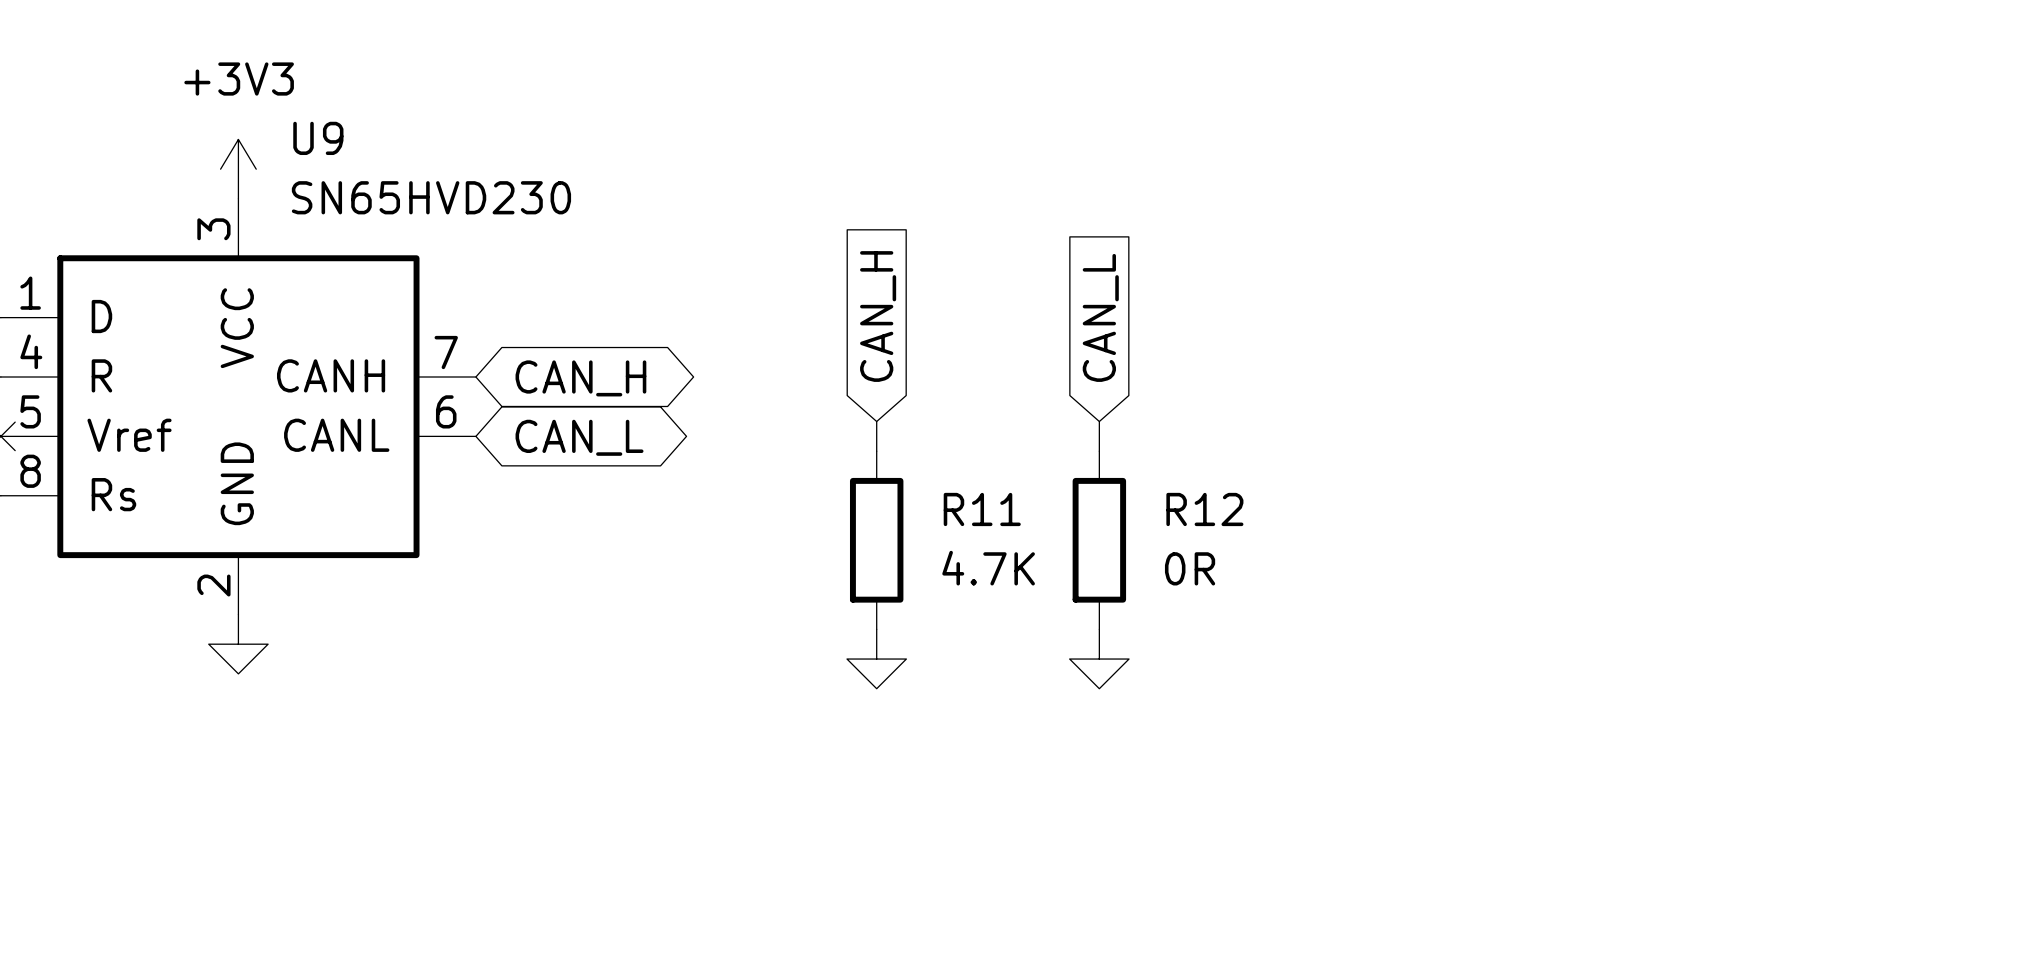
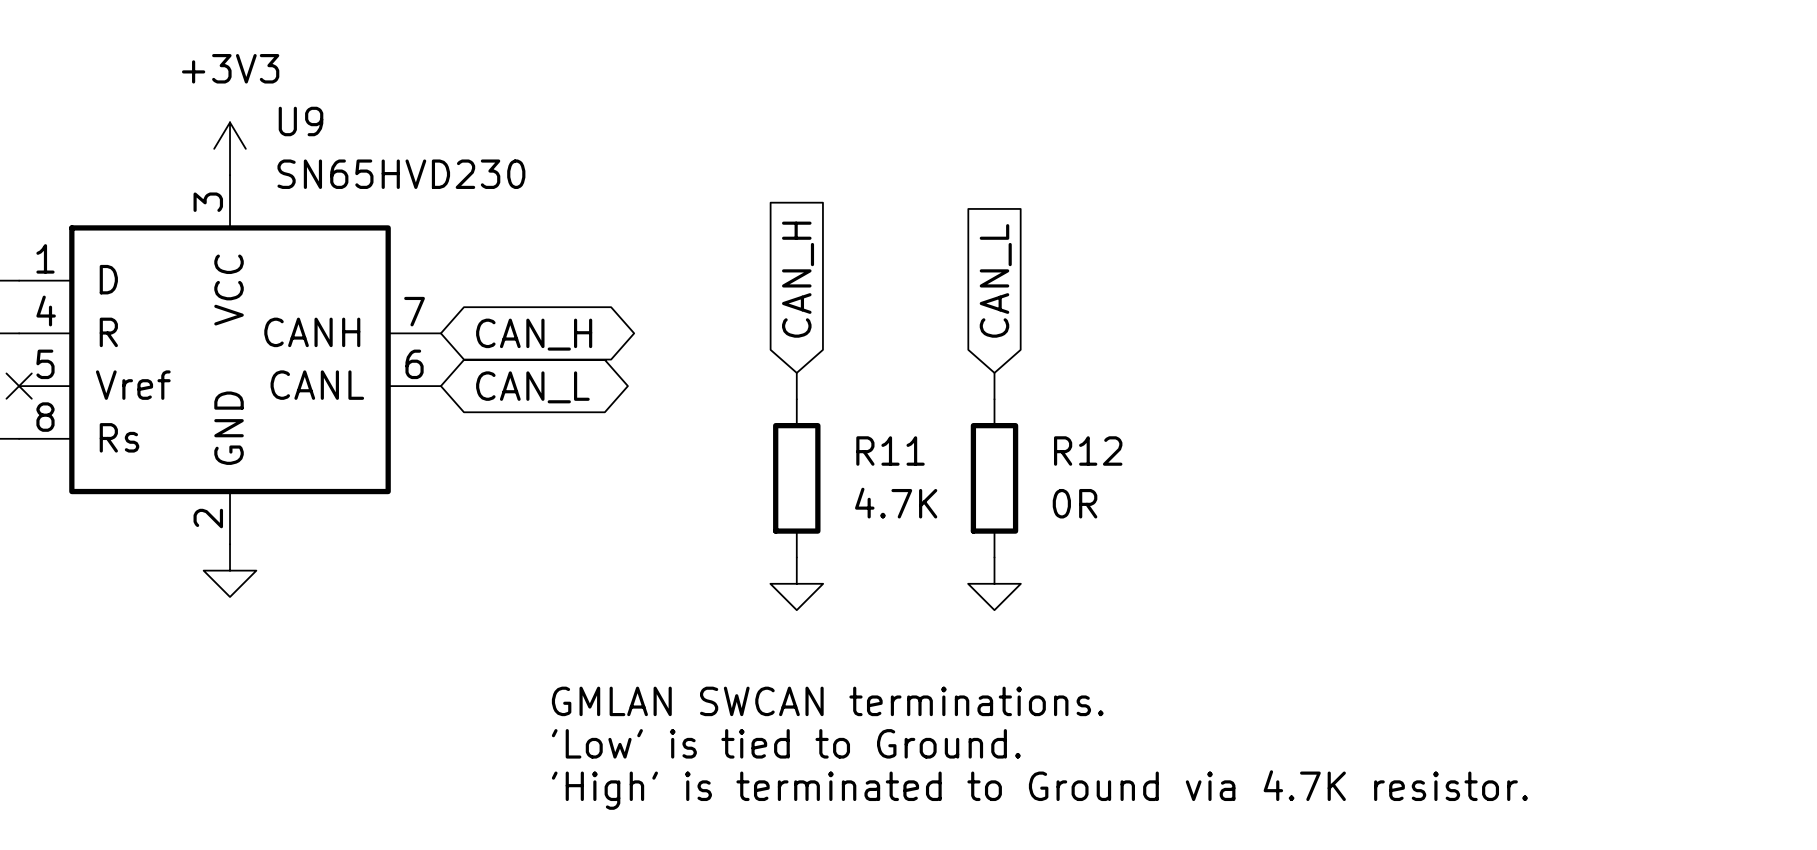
text: none -> GMLAN SWCAN terminations. (827, 701)
text: none -> 'Low' is tied to Ground. (786, 743)
text: none -> 'High' is terminated to Ground via 4.7K resistor. (1039, 790)

